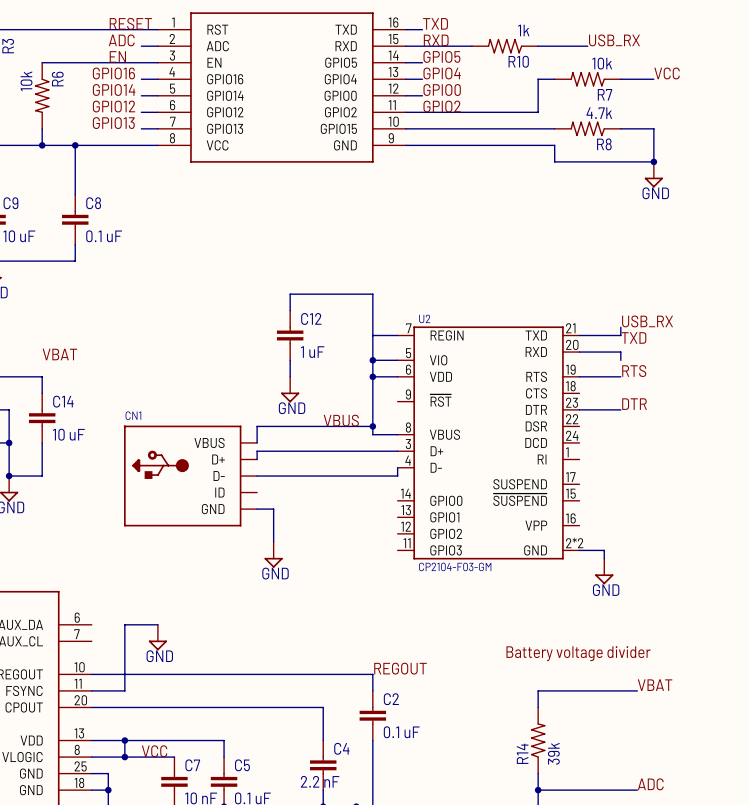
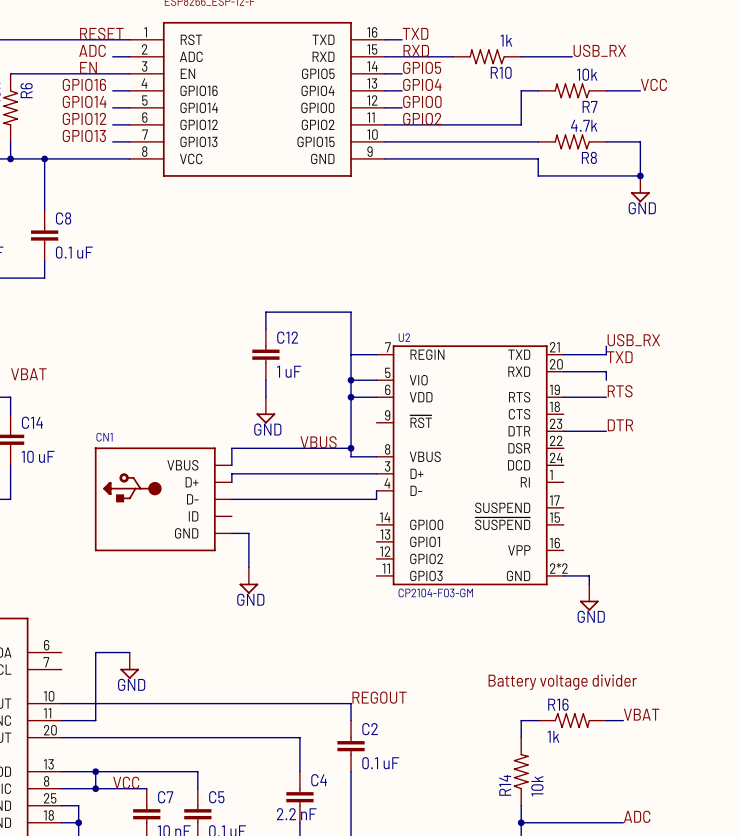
R16: none -> 1k (572, 720)
R14 value: 39k (553, 753) -> 10k (537, 786)

